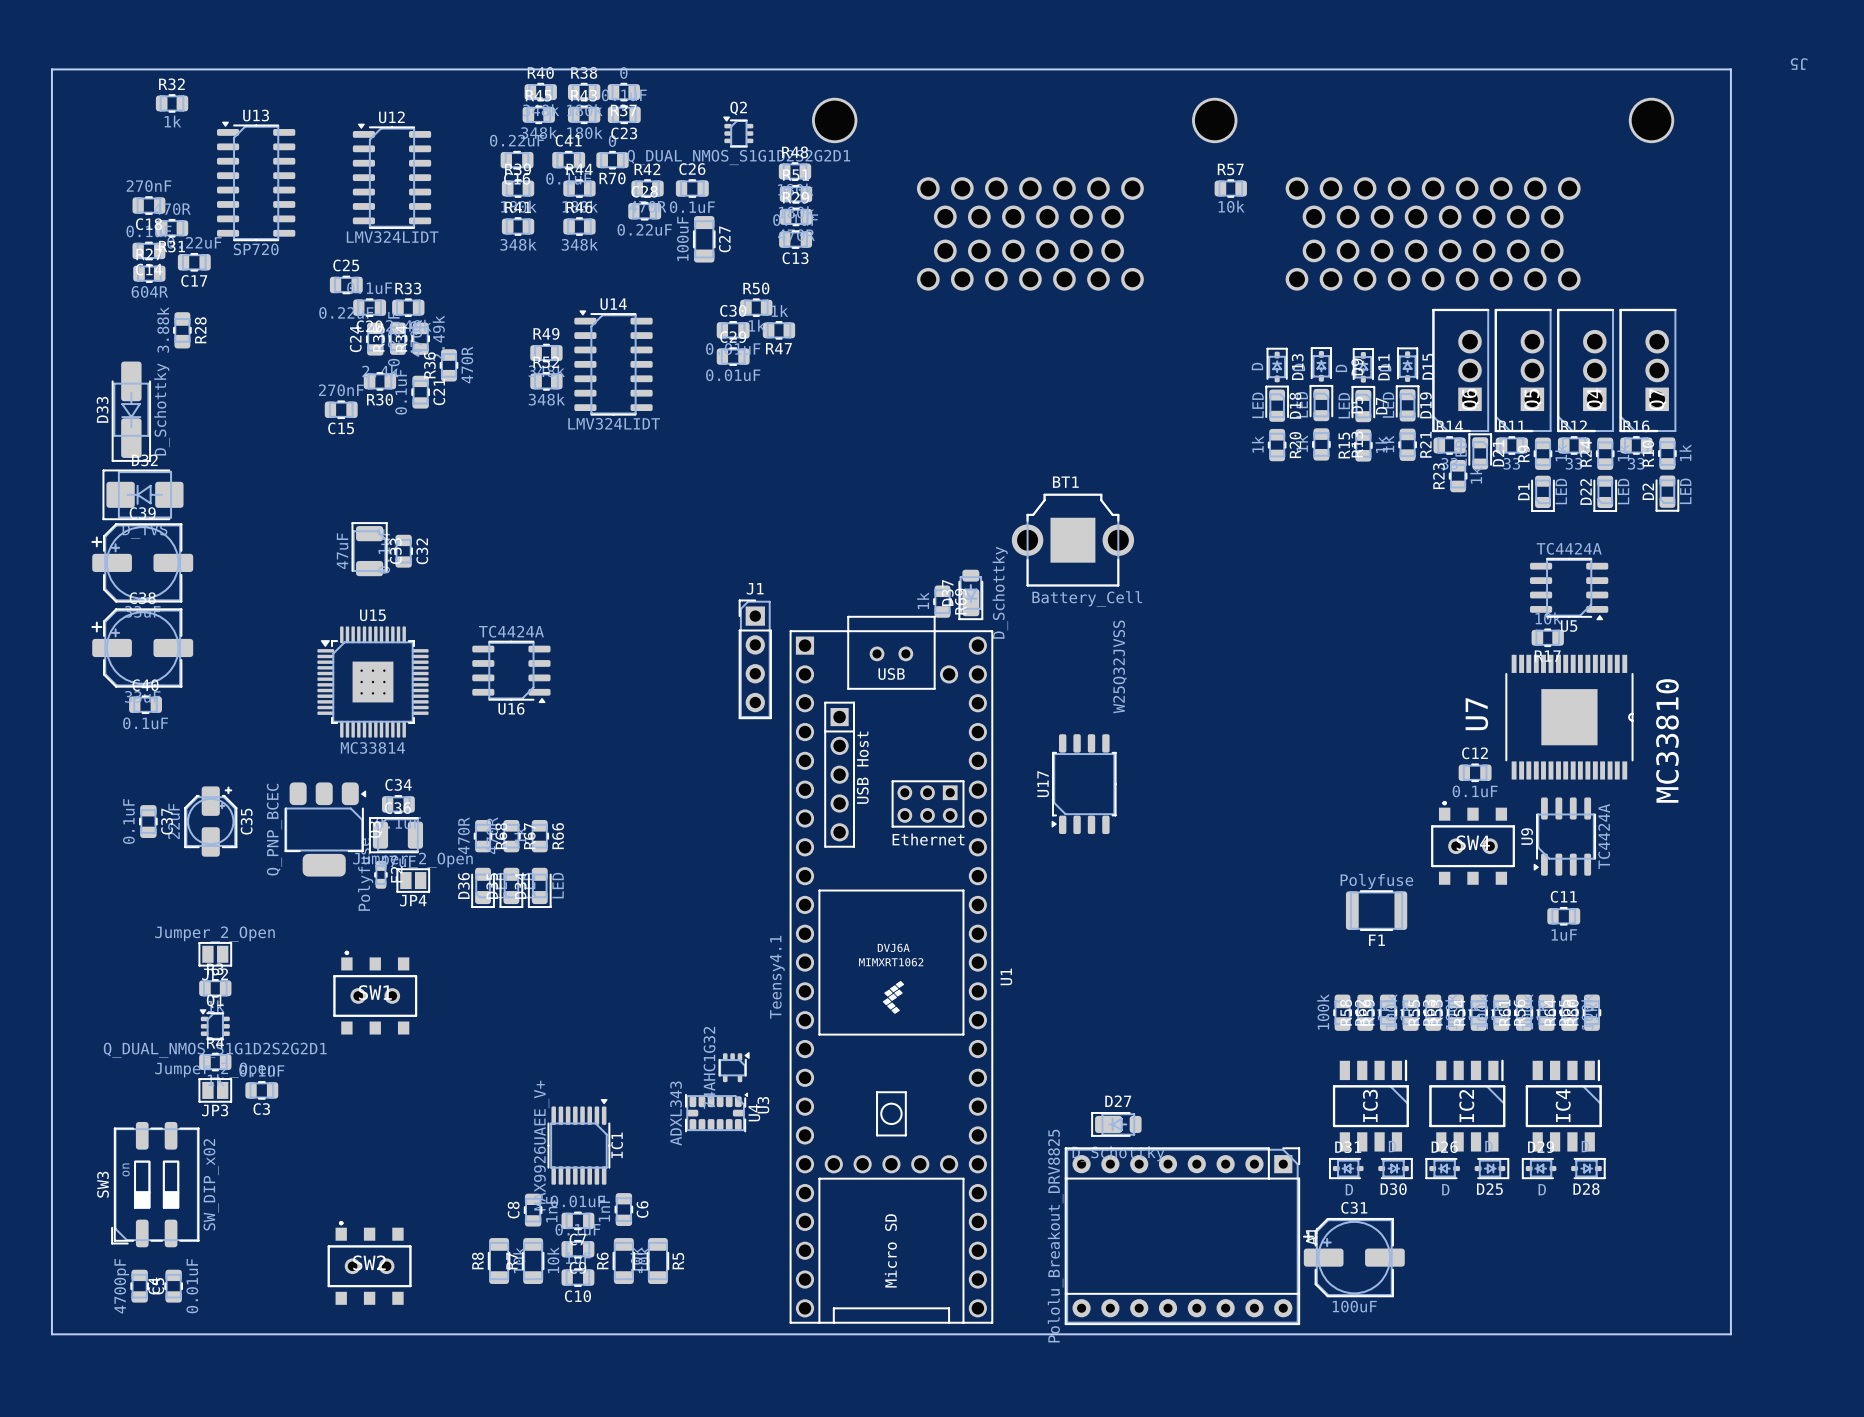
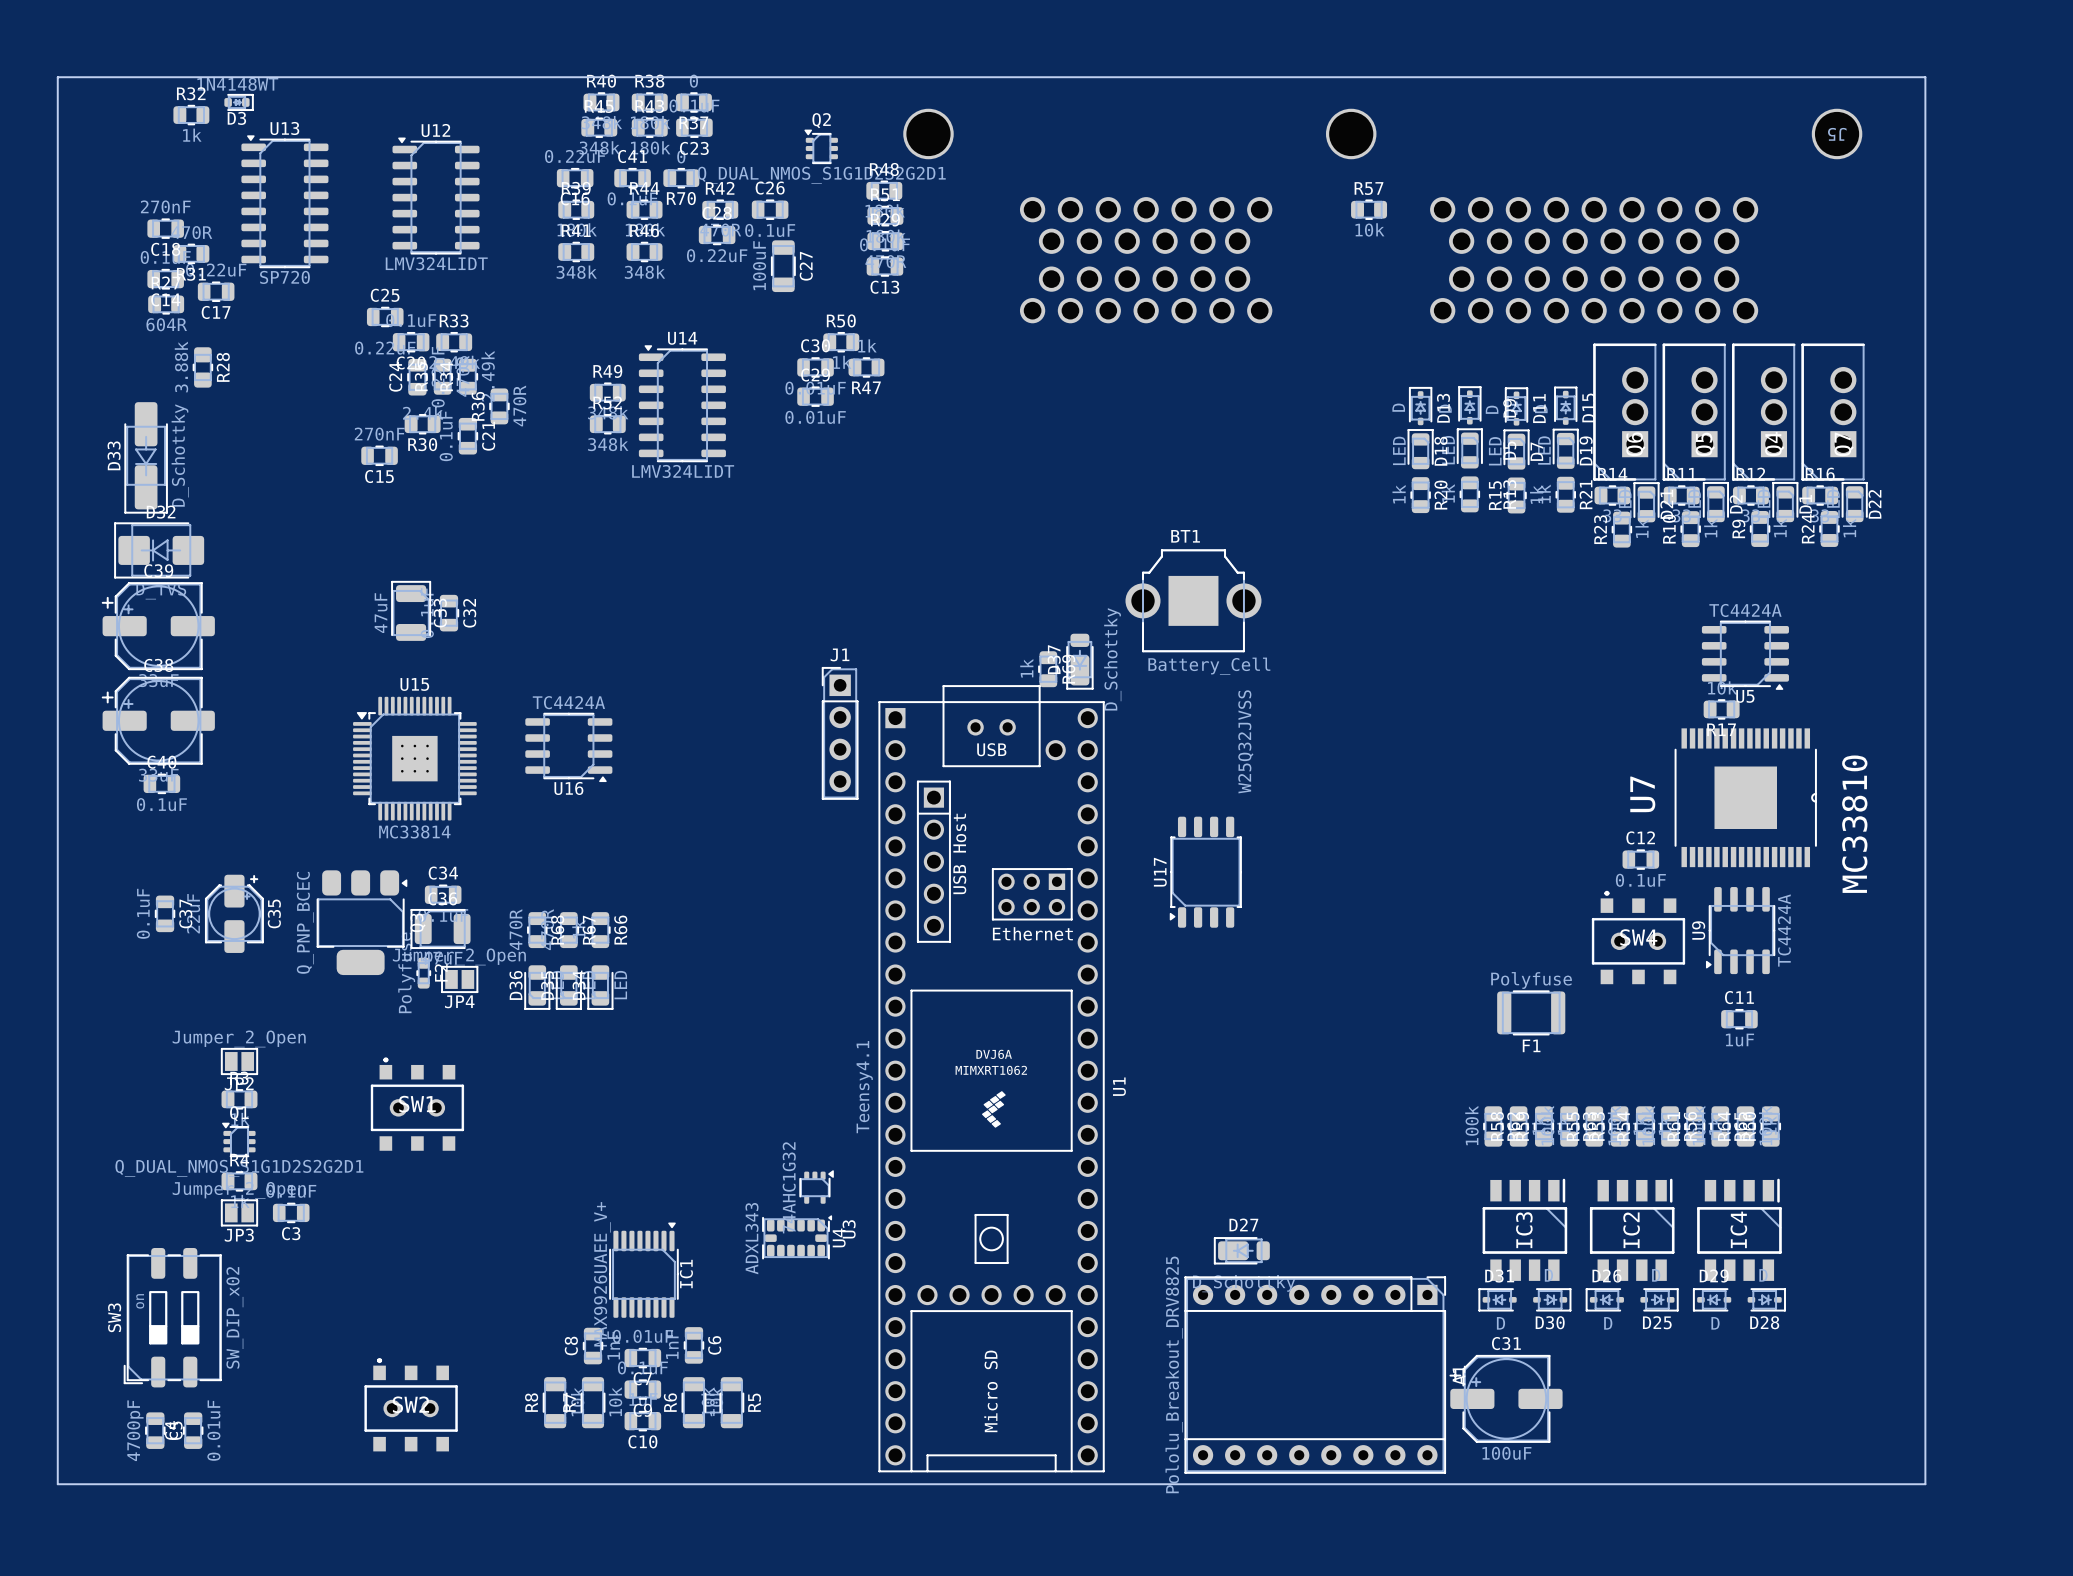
J5 name position: J5 (1799, 64) -> J5 (1837, 134)
D3: none -> 1N4148WT (238, 102)
R9 position: (1542, 453) -> (1760, 528)
R24 position: (1605, 453) -> (1829, 528)
R10 position: (1667, 453) -> (1690, 529)
D1 rotation: 0° (1542, 493) -> 180° (1785, 502)
D1 position: (1542, 493) -> (1785, 502)
D22 rotation: 0° (1605, 493) -> 180° (1854, 502)
D22 position: (1605, 493) -> (1854, 502)
D2 rotation: 0° (1667, 493) -> 180° (1715, 502)
D2 position: (1667, 493) -> (1715, 502)

